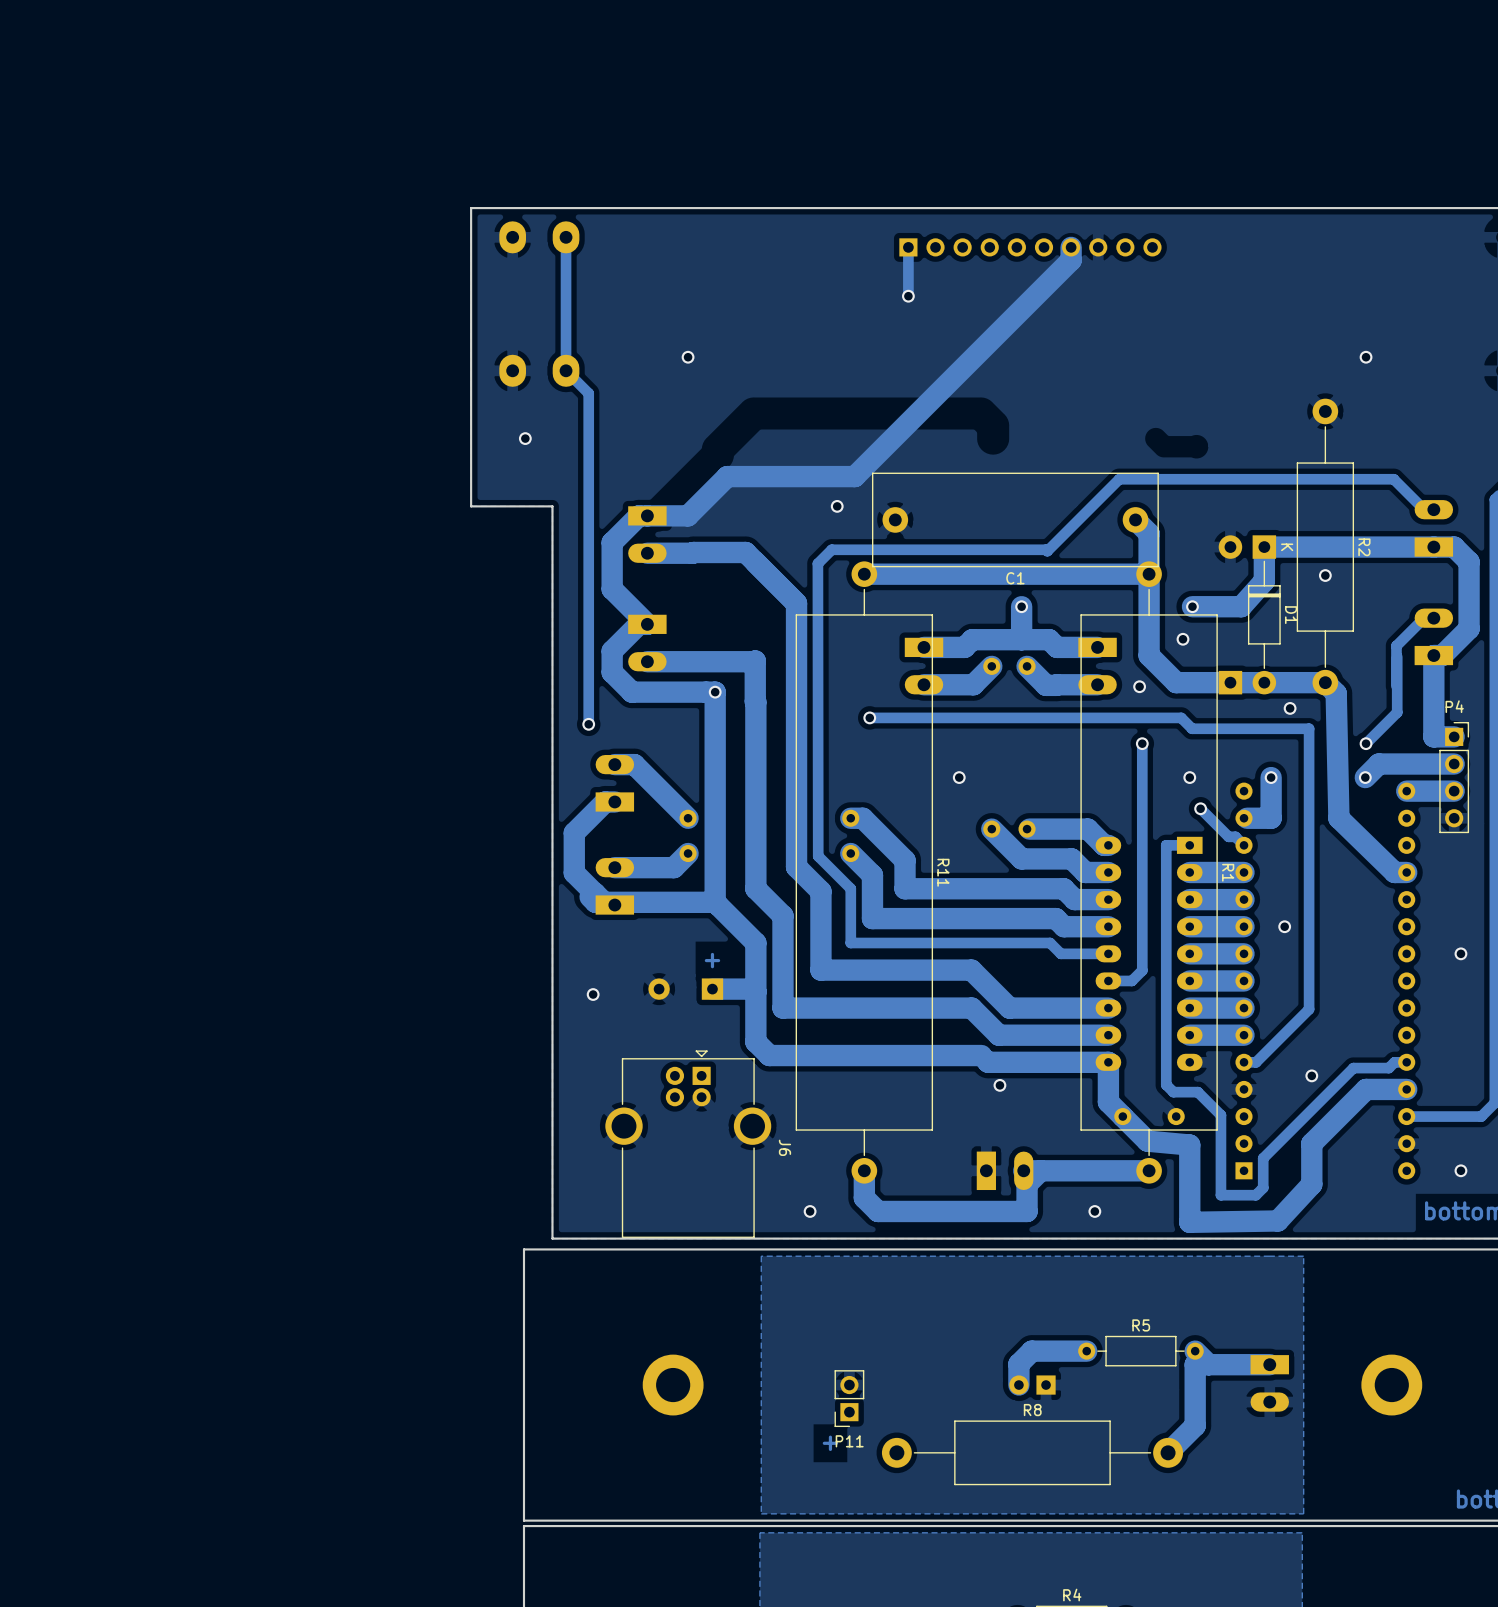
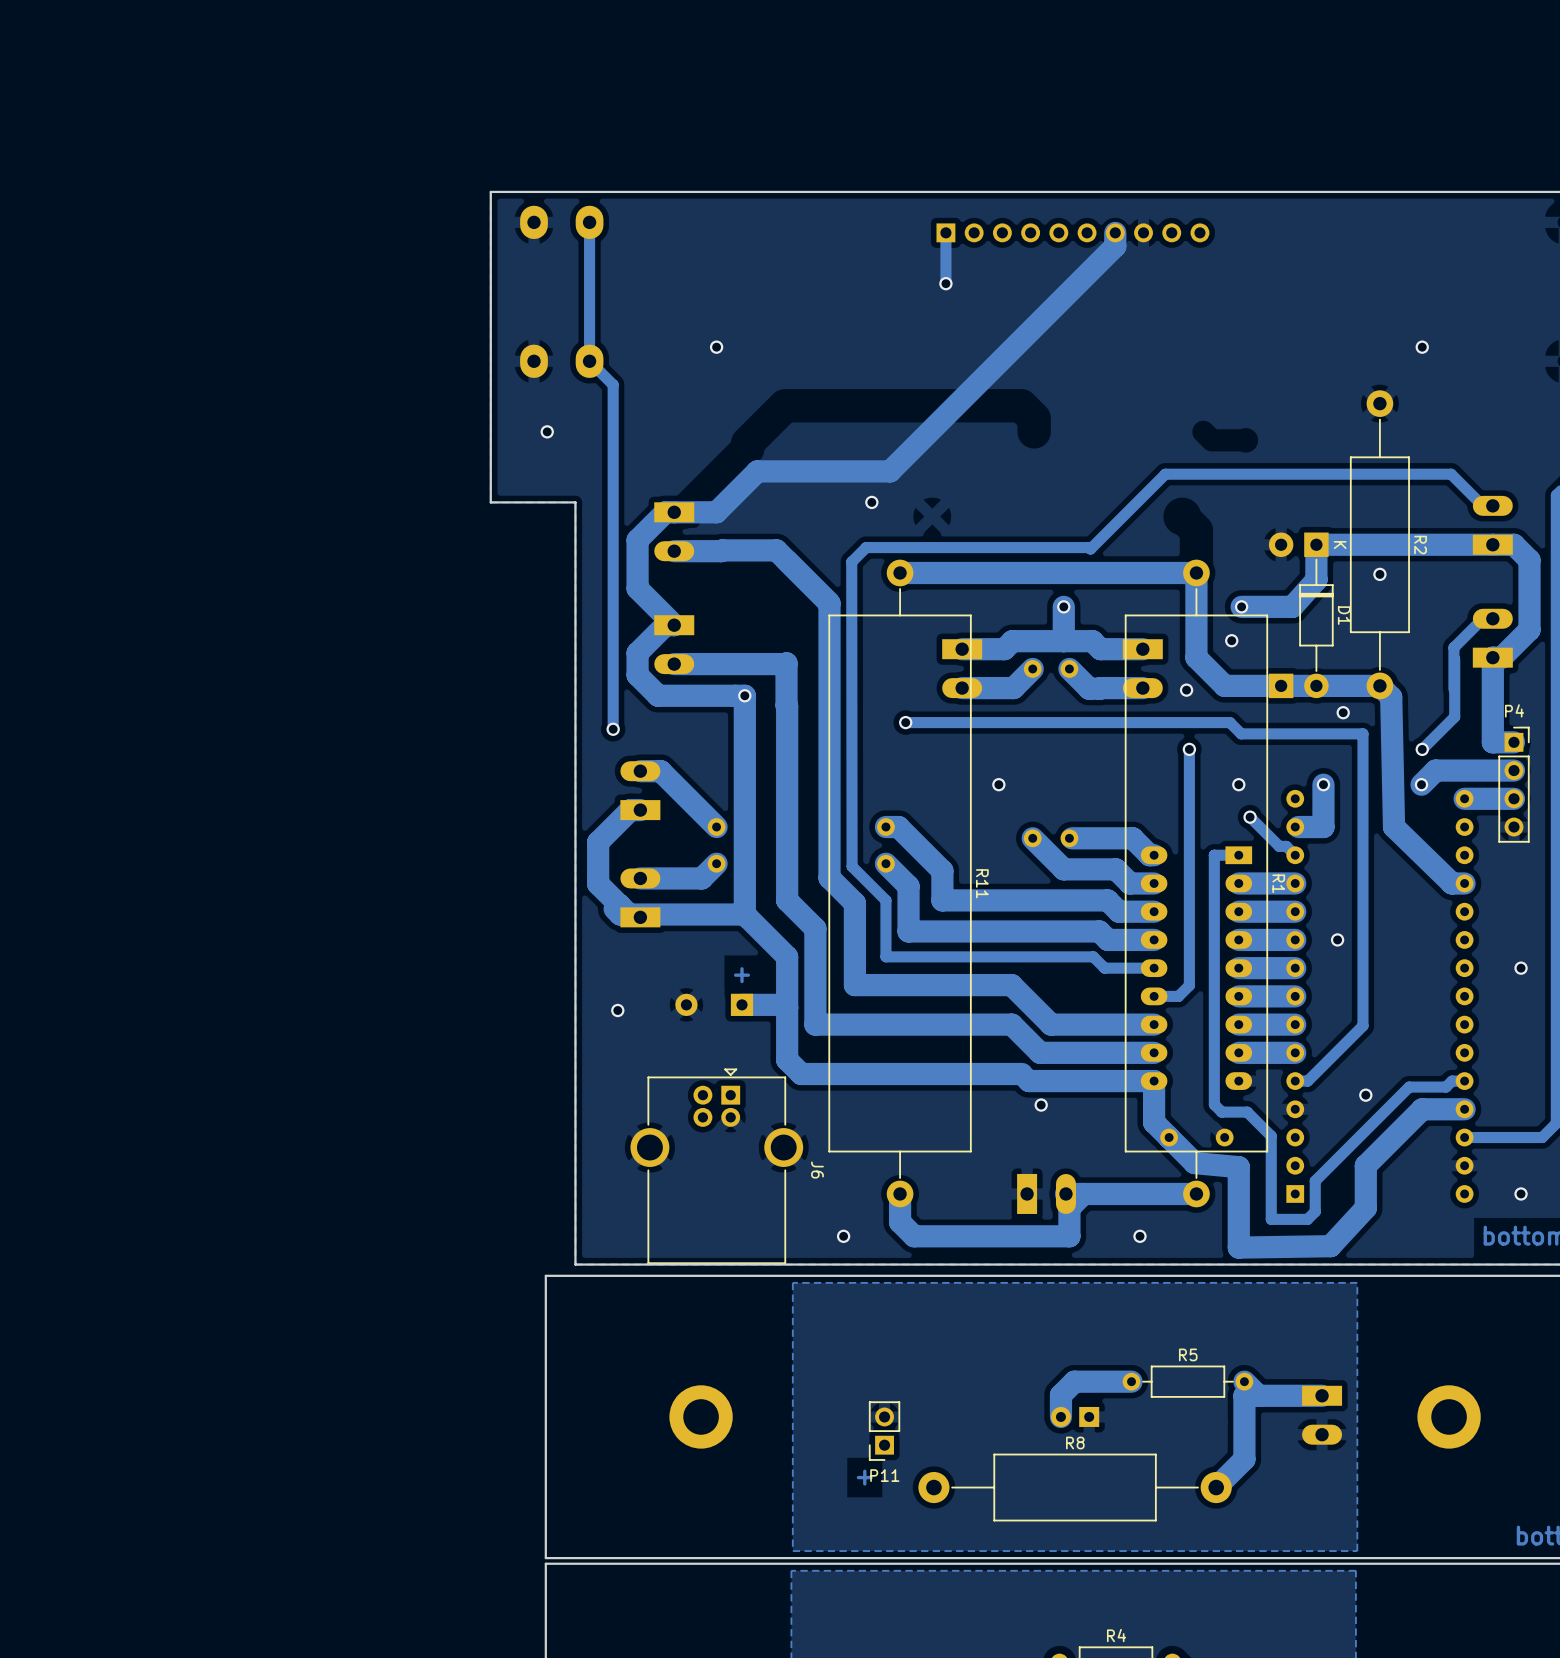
C1: (1015, 519) -> none
track: (1135, 519) (1149, 533) (1149, 574) -> none

